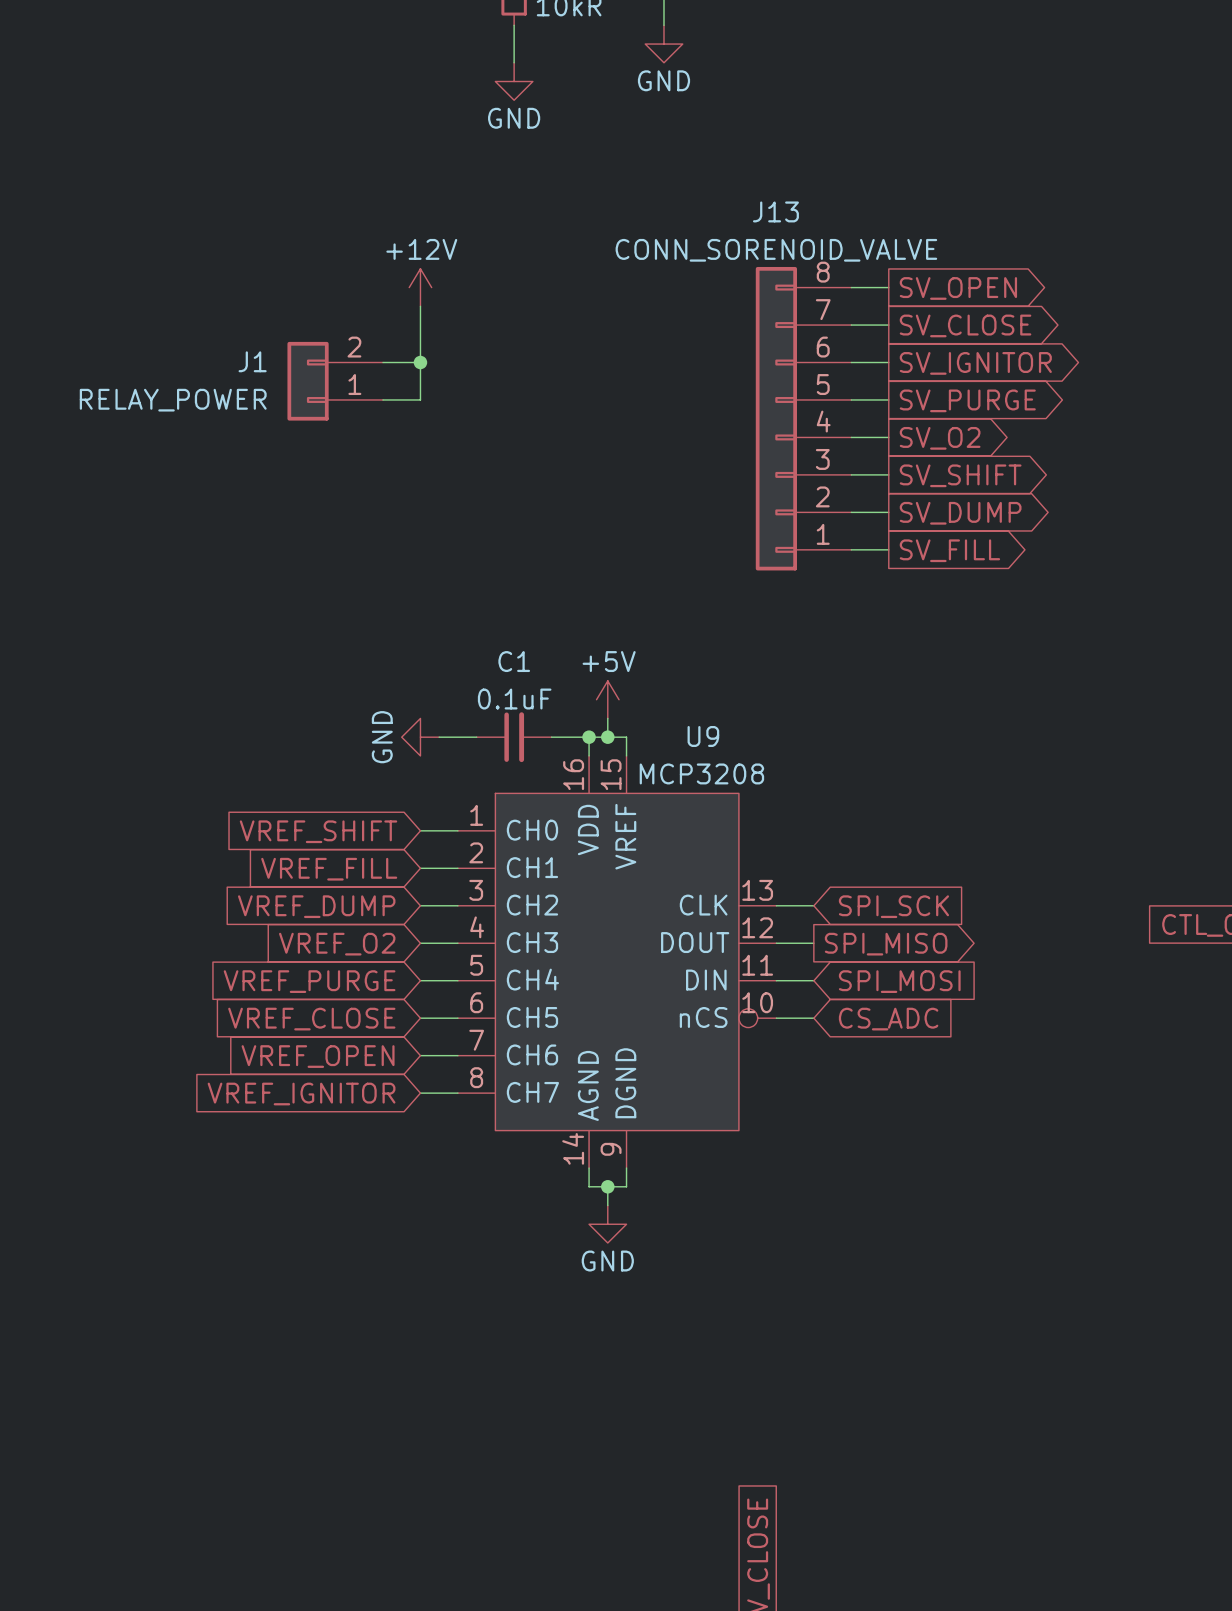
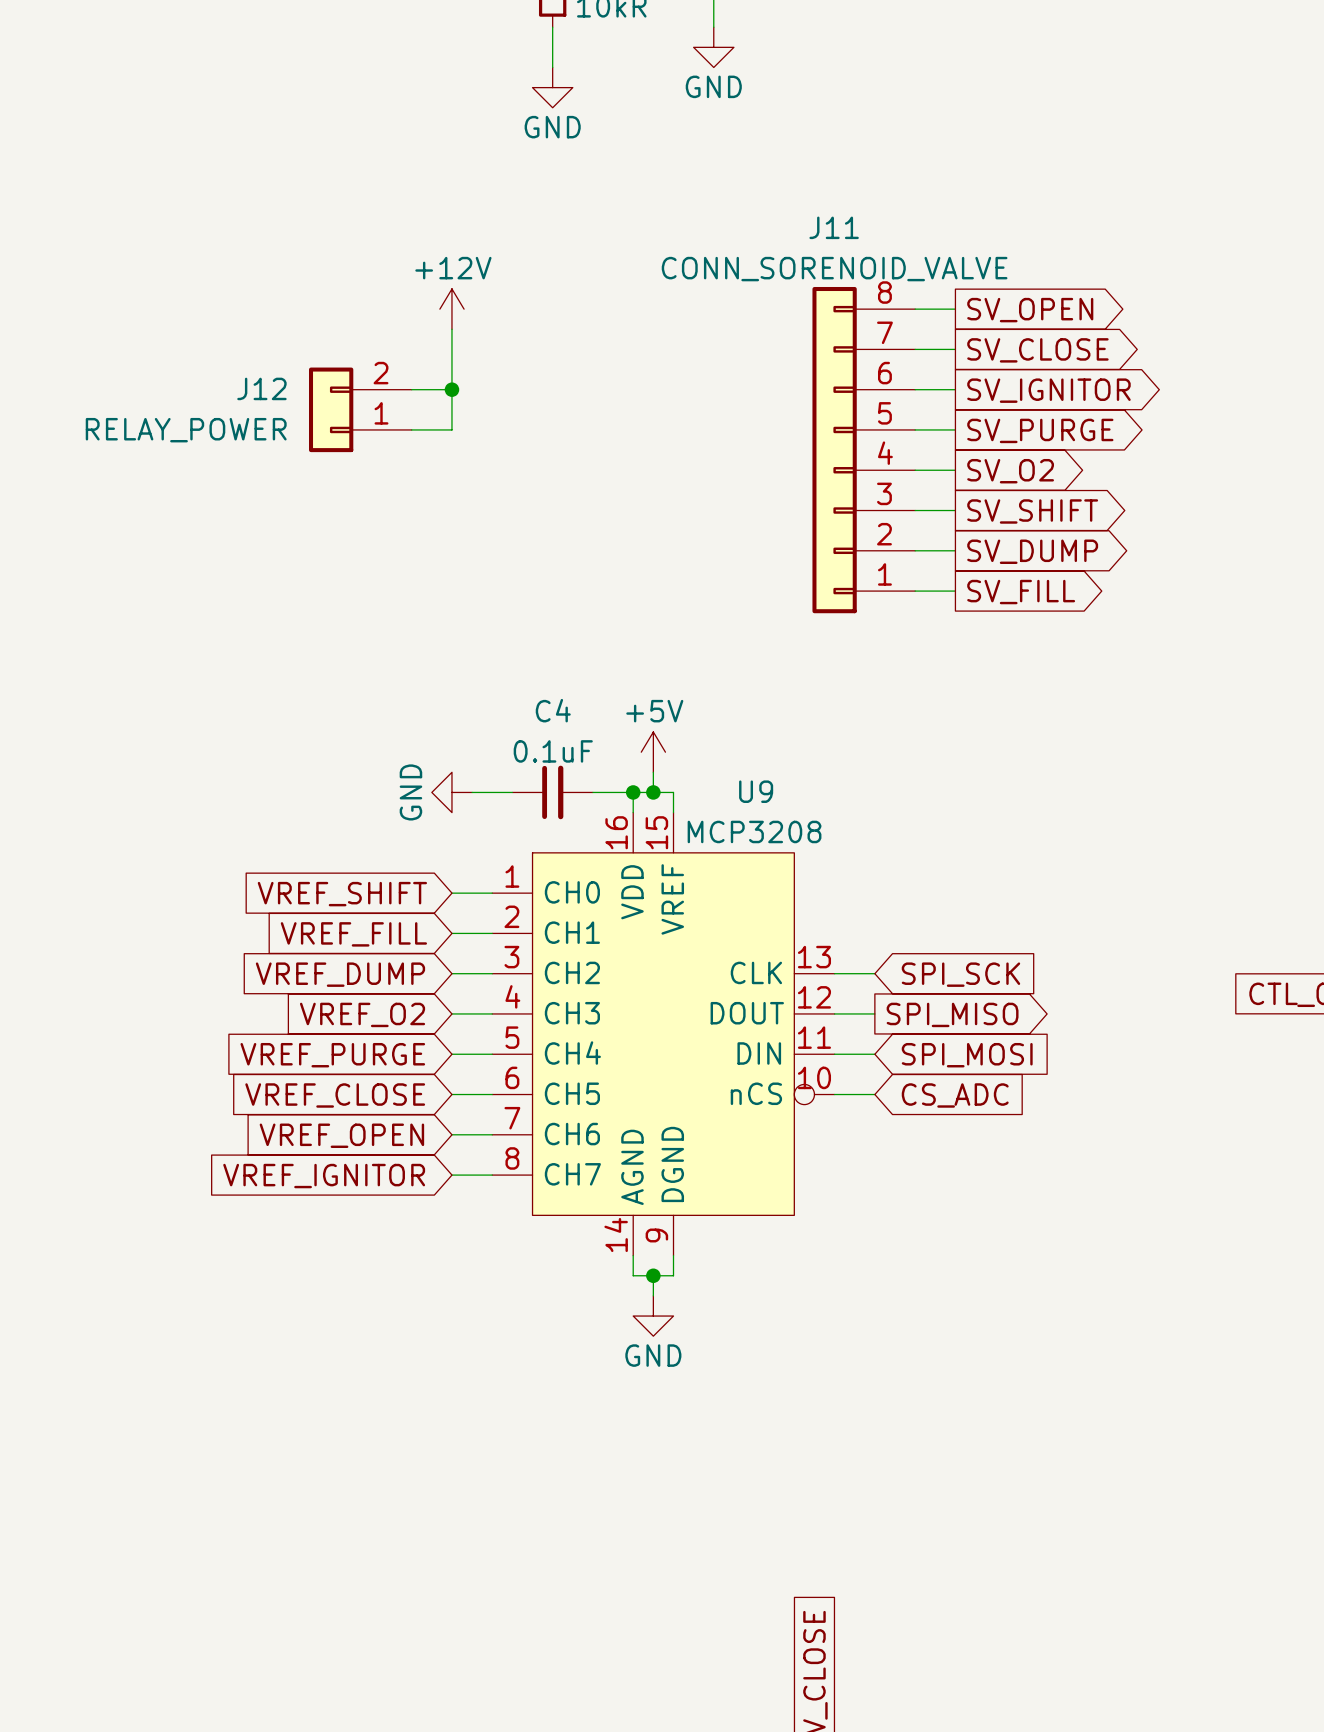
J13 name: J13 (775, 211) -> J11 (834, 227)
J1 name: J1 (252, 361) -> J12 (261, 388)
C1 name: C1 (514, 661) -> C4 (553, 710)

